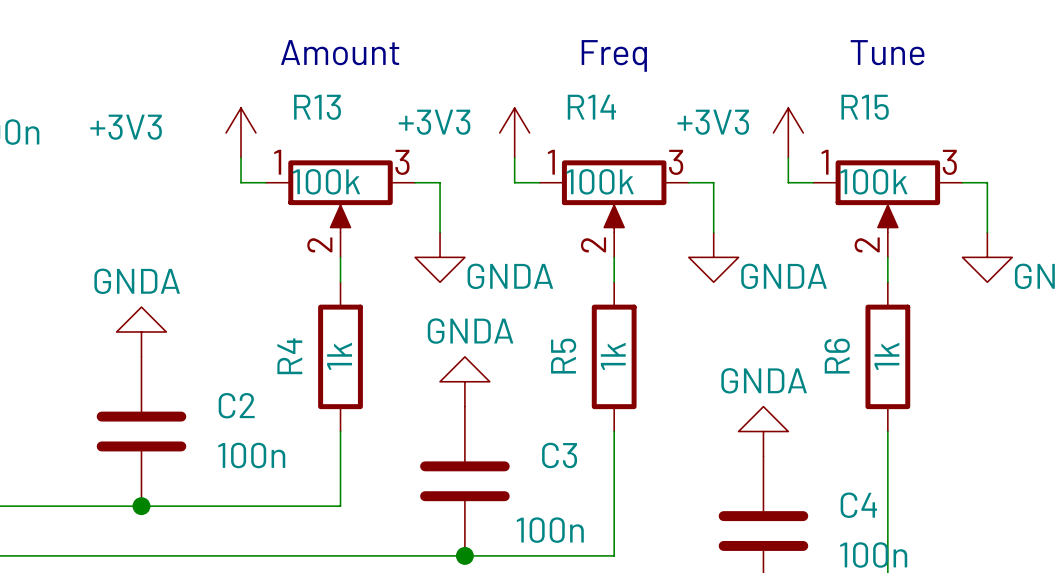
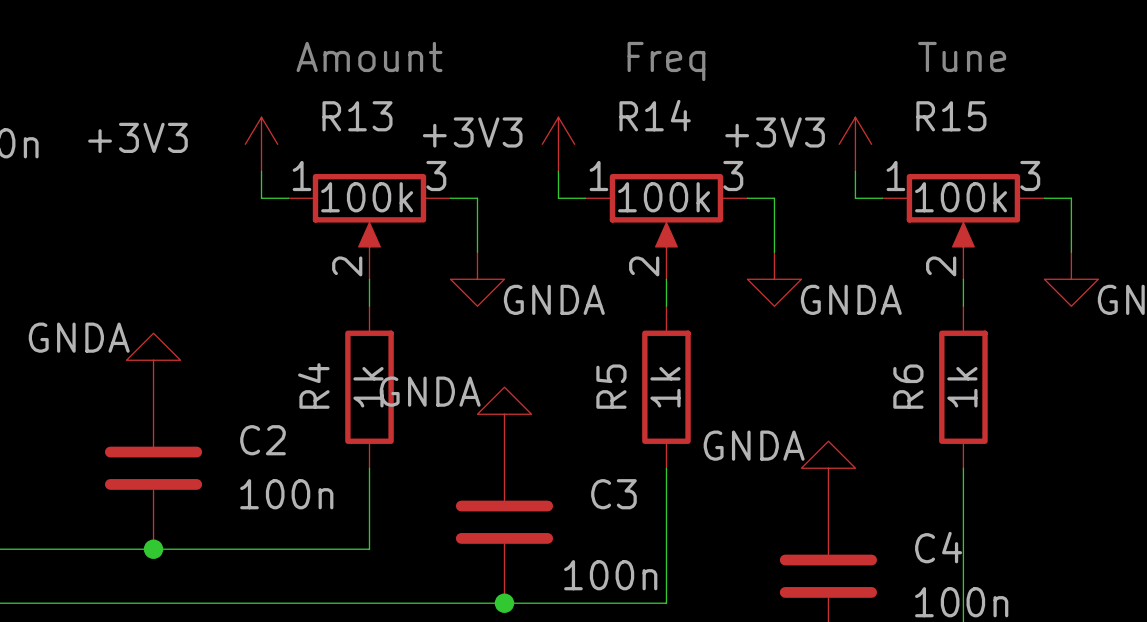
power symbol text position: GNDA (137, 281) -> GNDA (79, 337)
power symbol text position: GNDA (470, 331) -> GNDA (430, 391)
power symbol text position: GNDA (764, 380) -> GNDA (754, 445)

